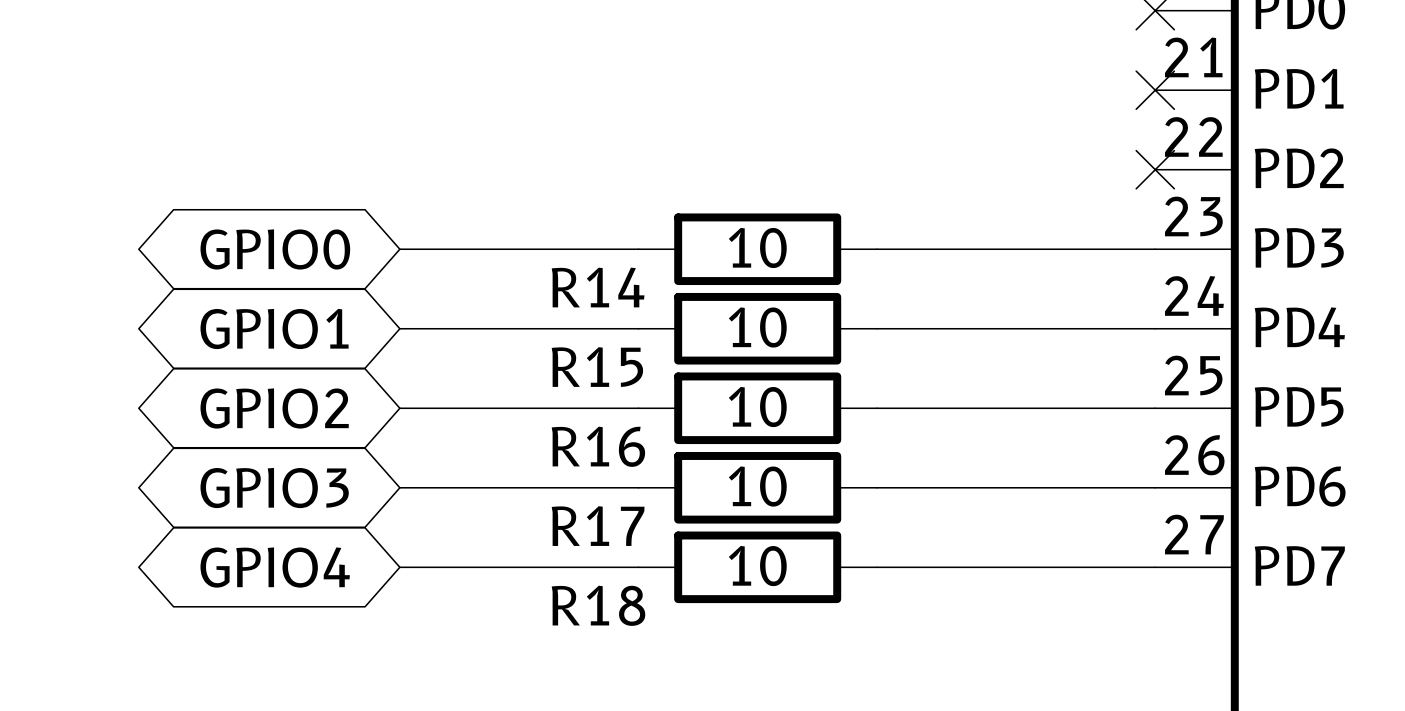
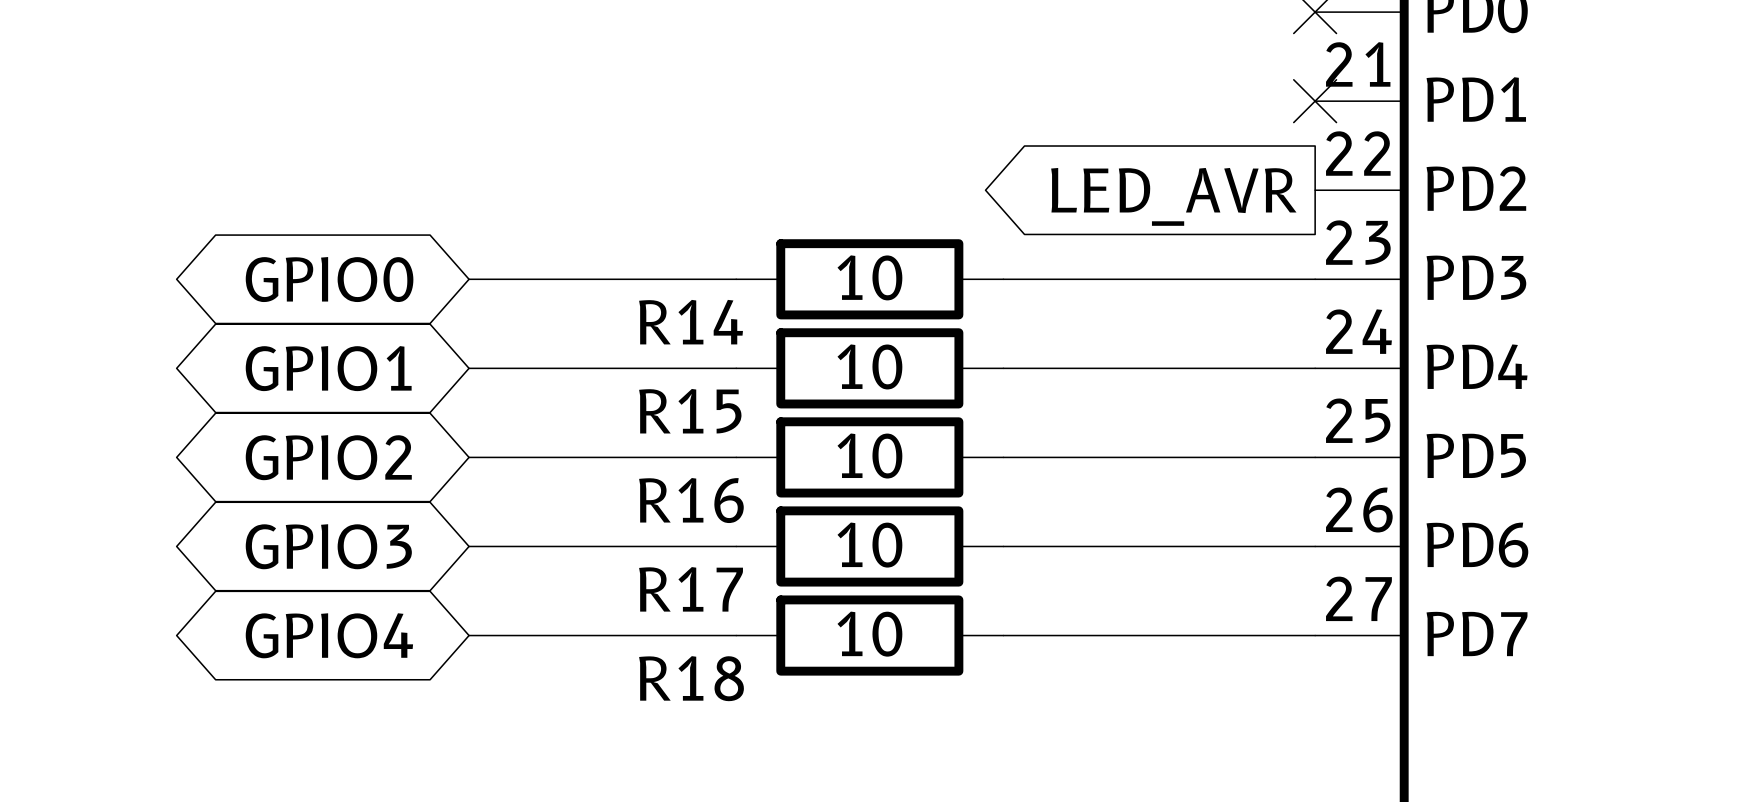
no-connect mark: (1155, 169) -> none
global label: none -> LED_AVR (1173, 196)

